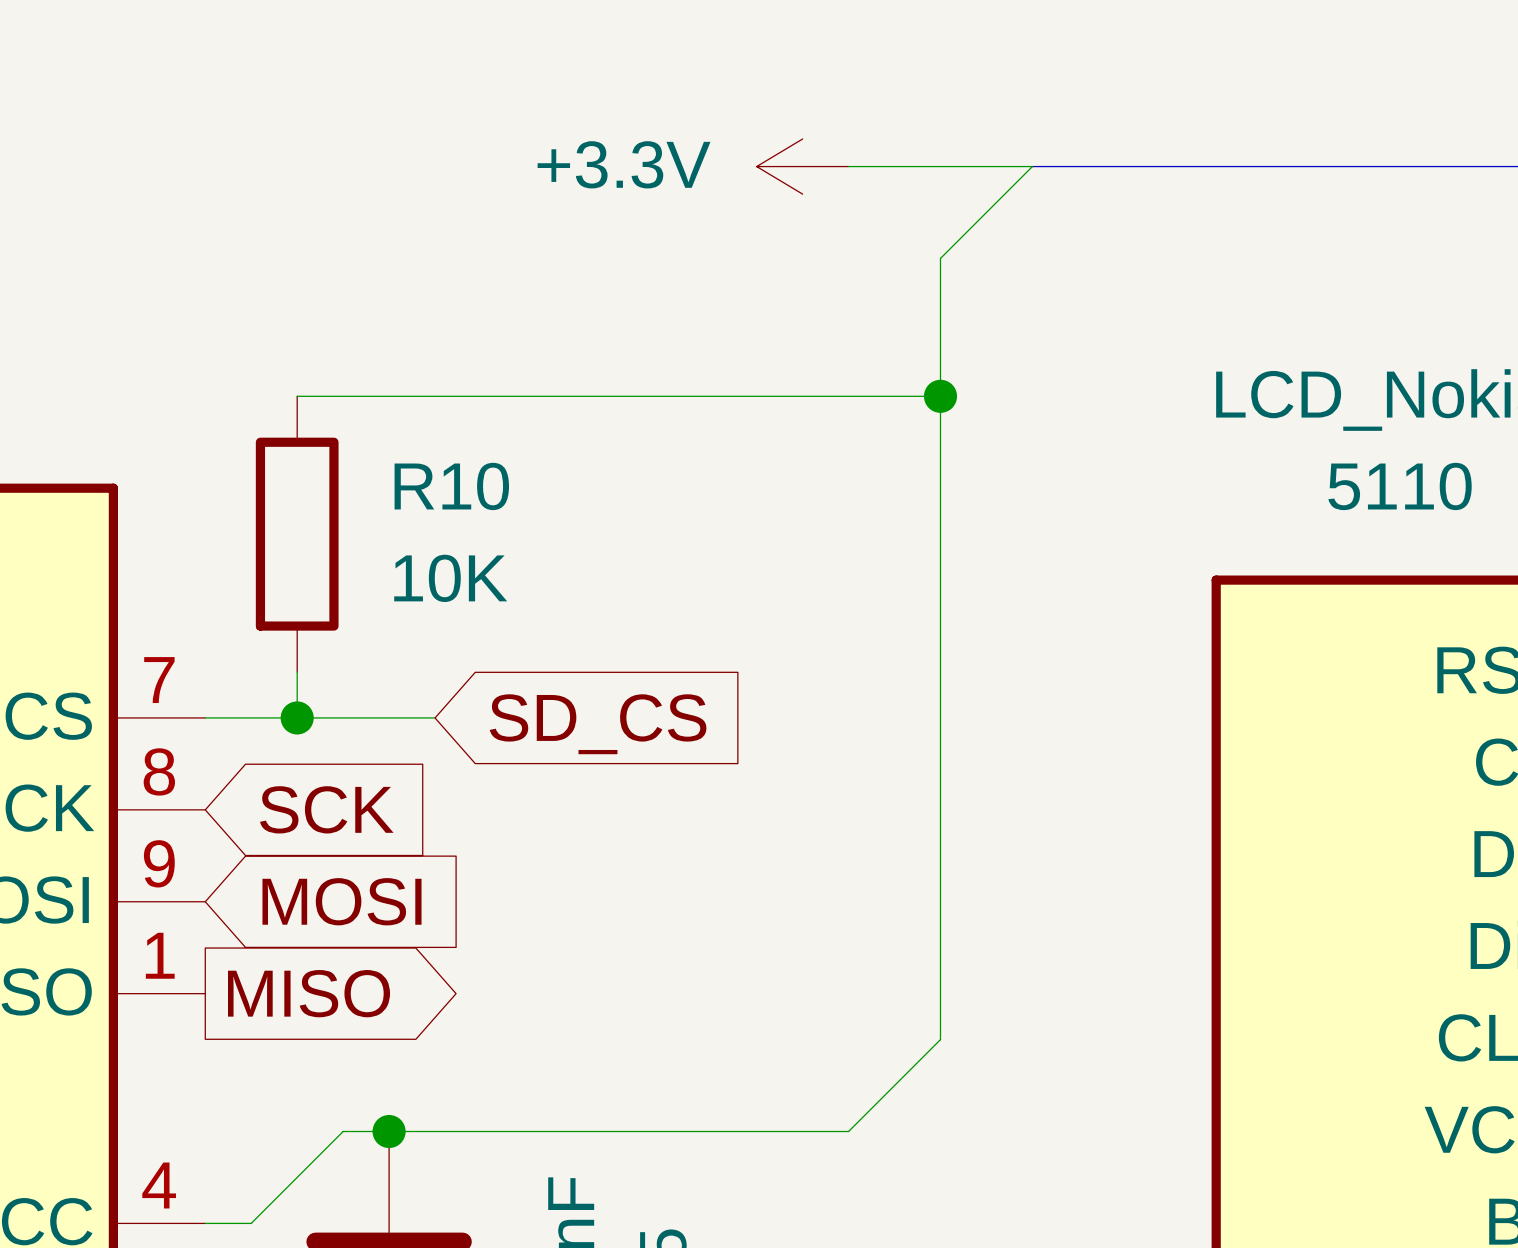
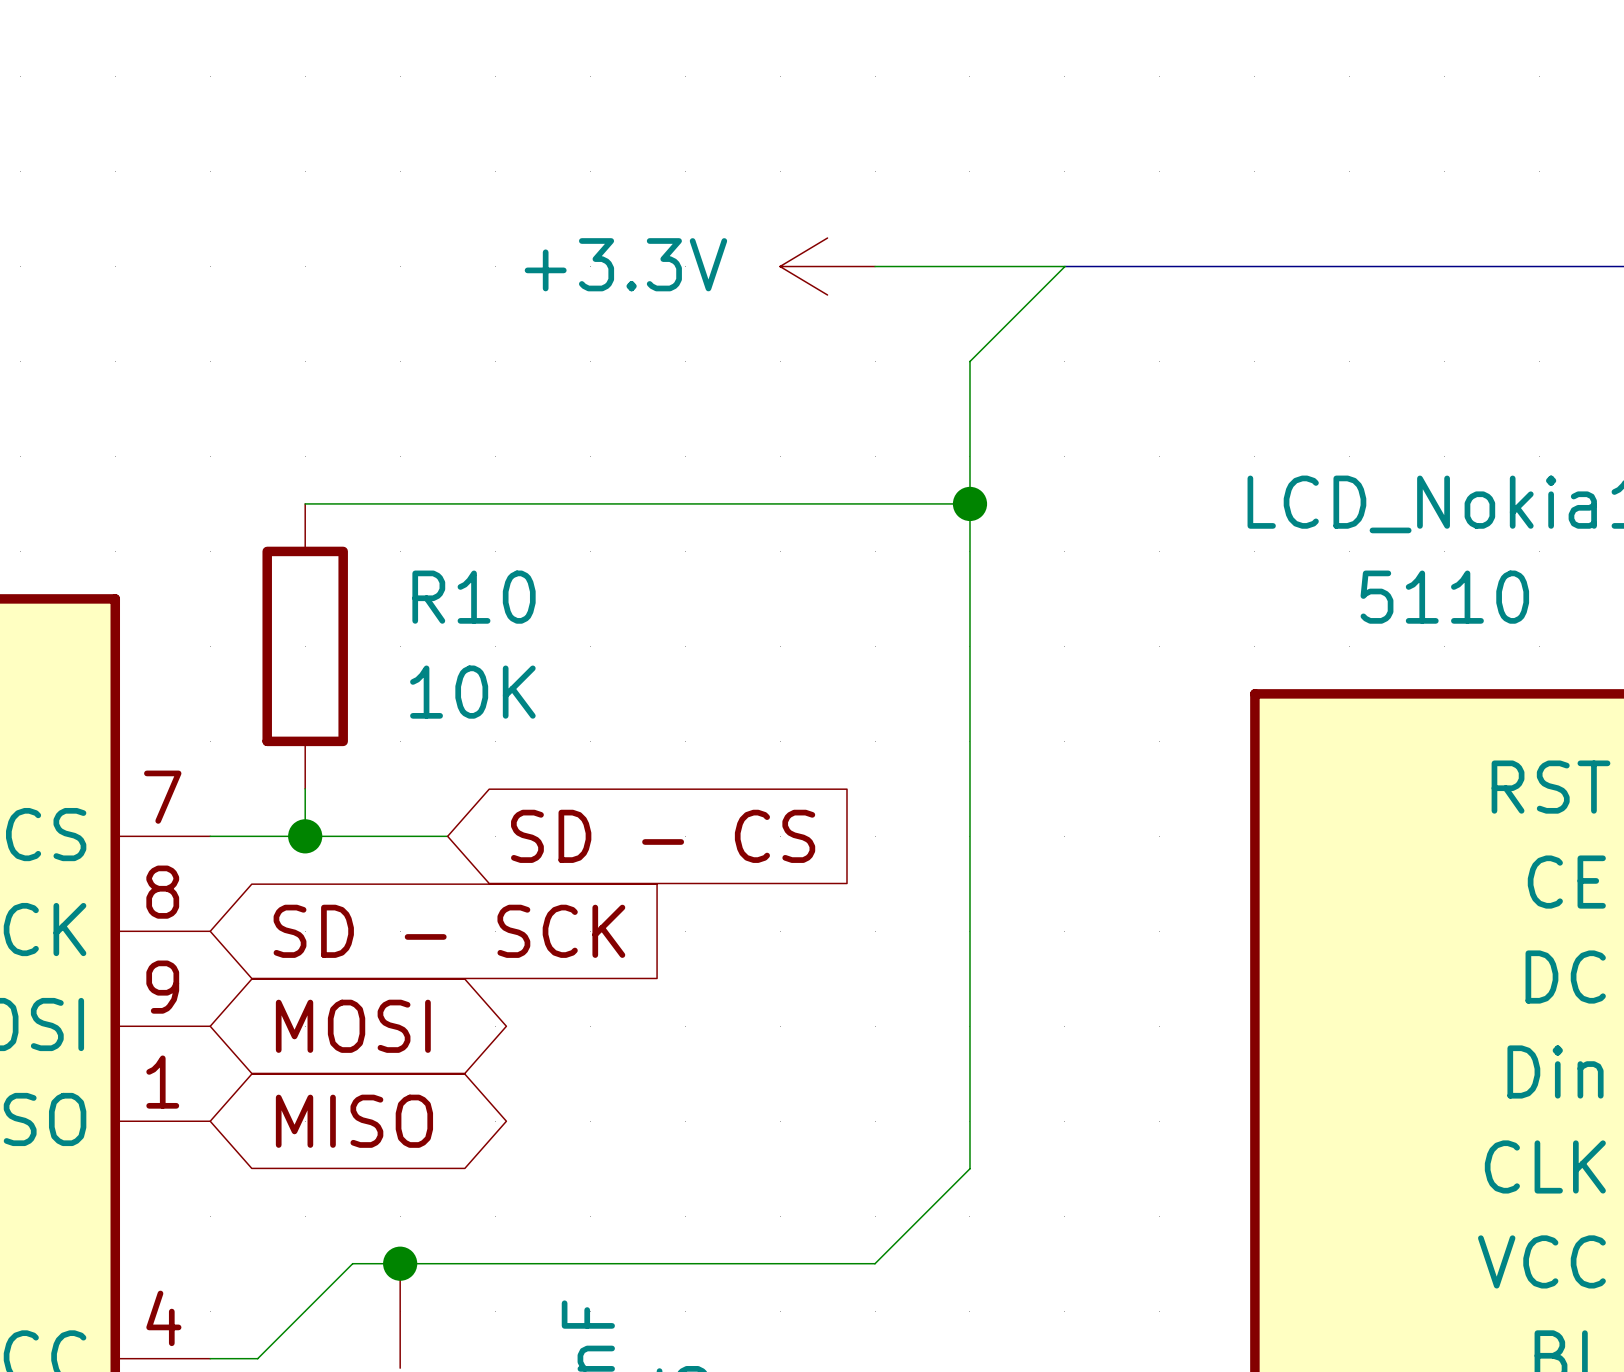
global label: SD_CS (598, 724) -> SD - CS (663, 836)
global label: SCK (326, 809) -> SD - SCK (449, 931)
global label shape: input (342, 901) -> bidirectional (353, 1026)
global label shape: output (309, 993) -> bidirectional (354, 1121)

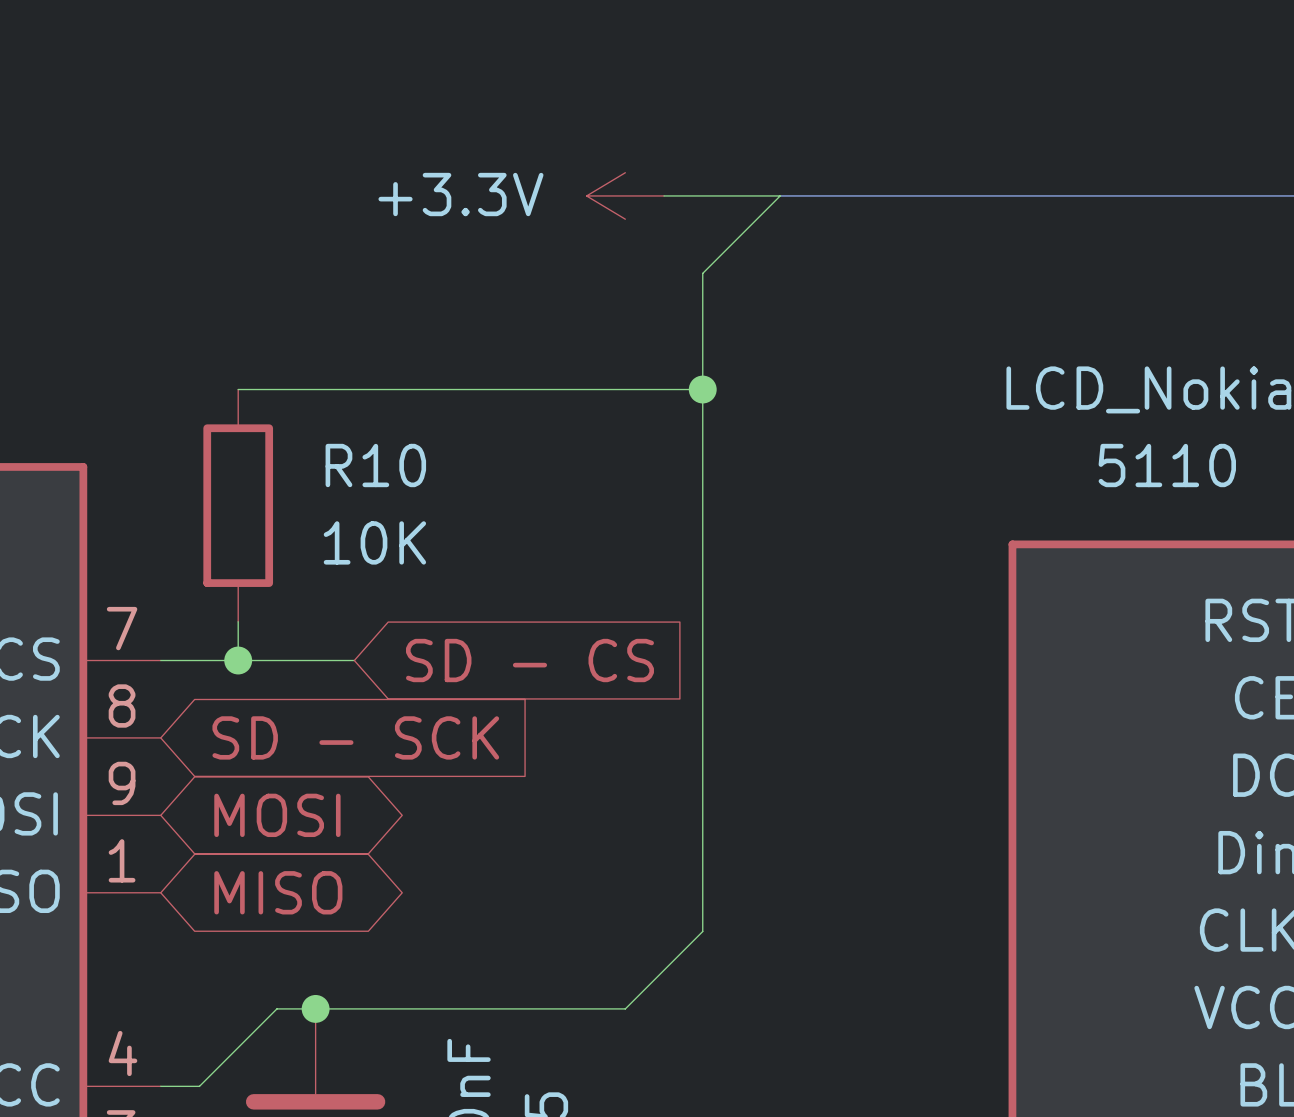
power symbol position: +3.3V (827, 266) -> +3.3V (625, 195)
wire: (969, 266) (1064, 266) (969, 361) (969, 1168) (875, 1263) (780, 1263) -> (780, 195) (702, 273) (702, 931) (625, 1008)
bus: none -> (780, 195) (857, 195)
wire: (875, 503) (969, 503) -> none
junction position: (969, 503) -> (702, 389)

